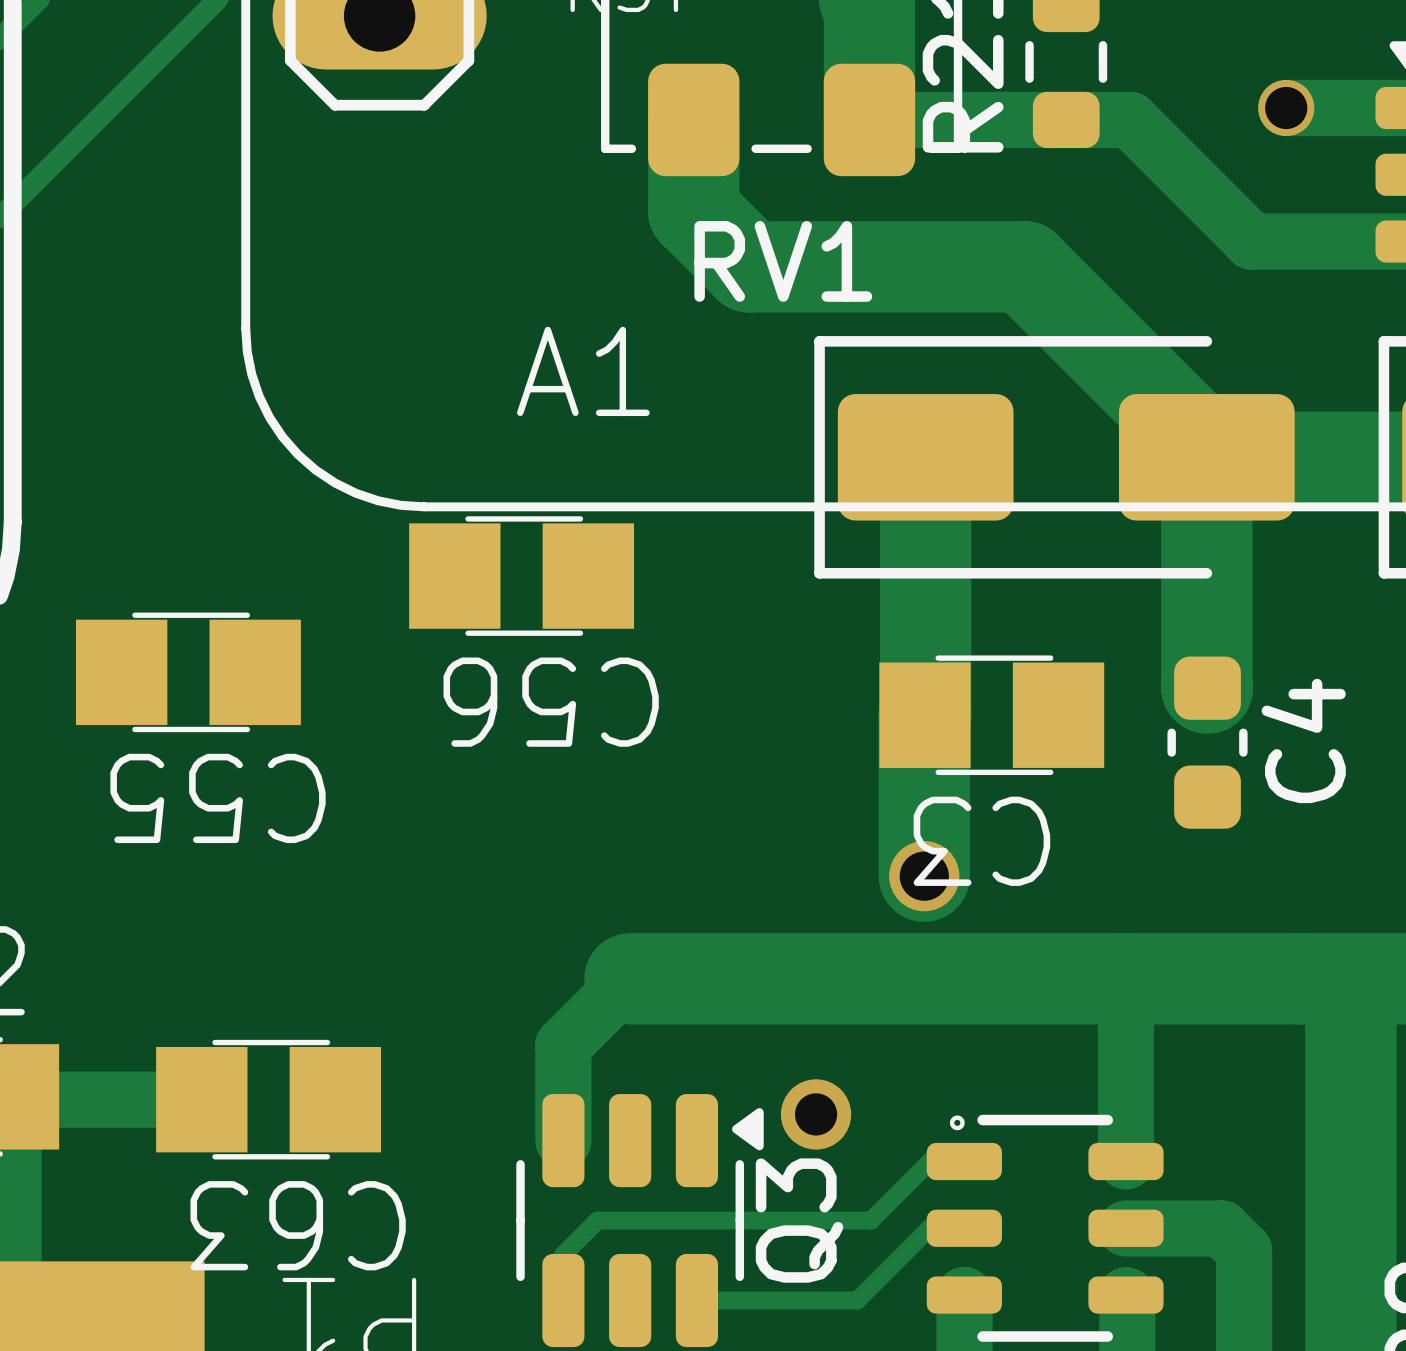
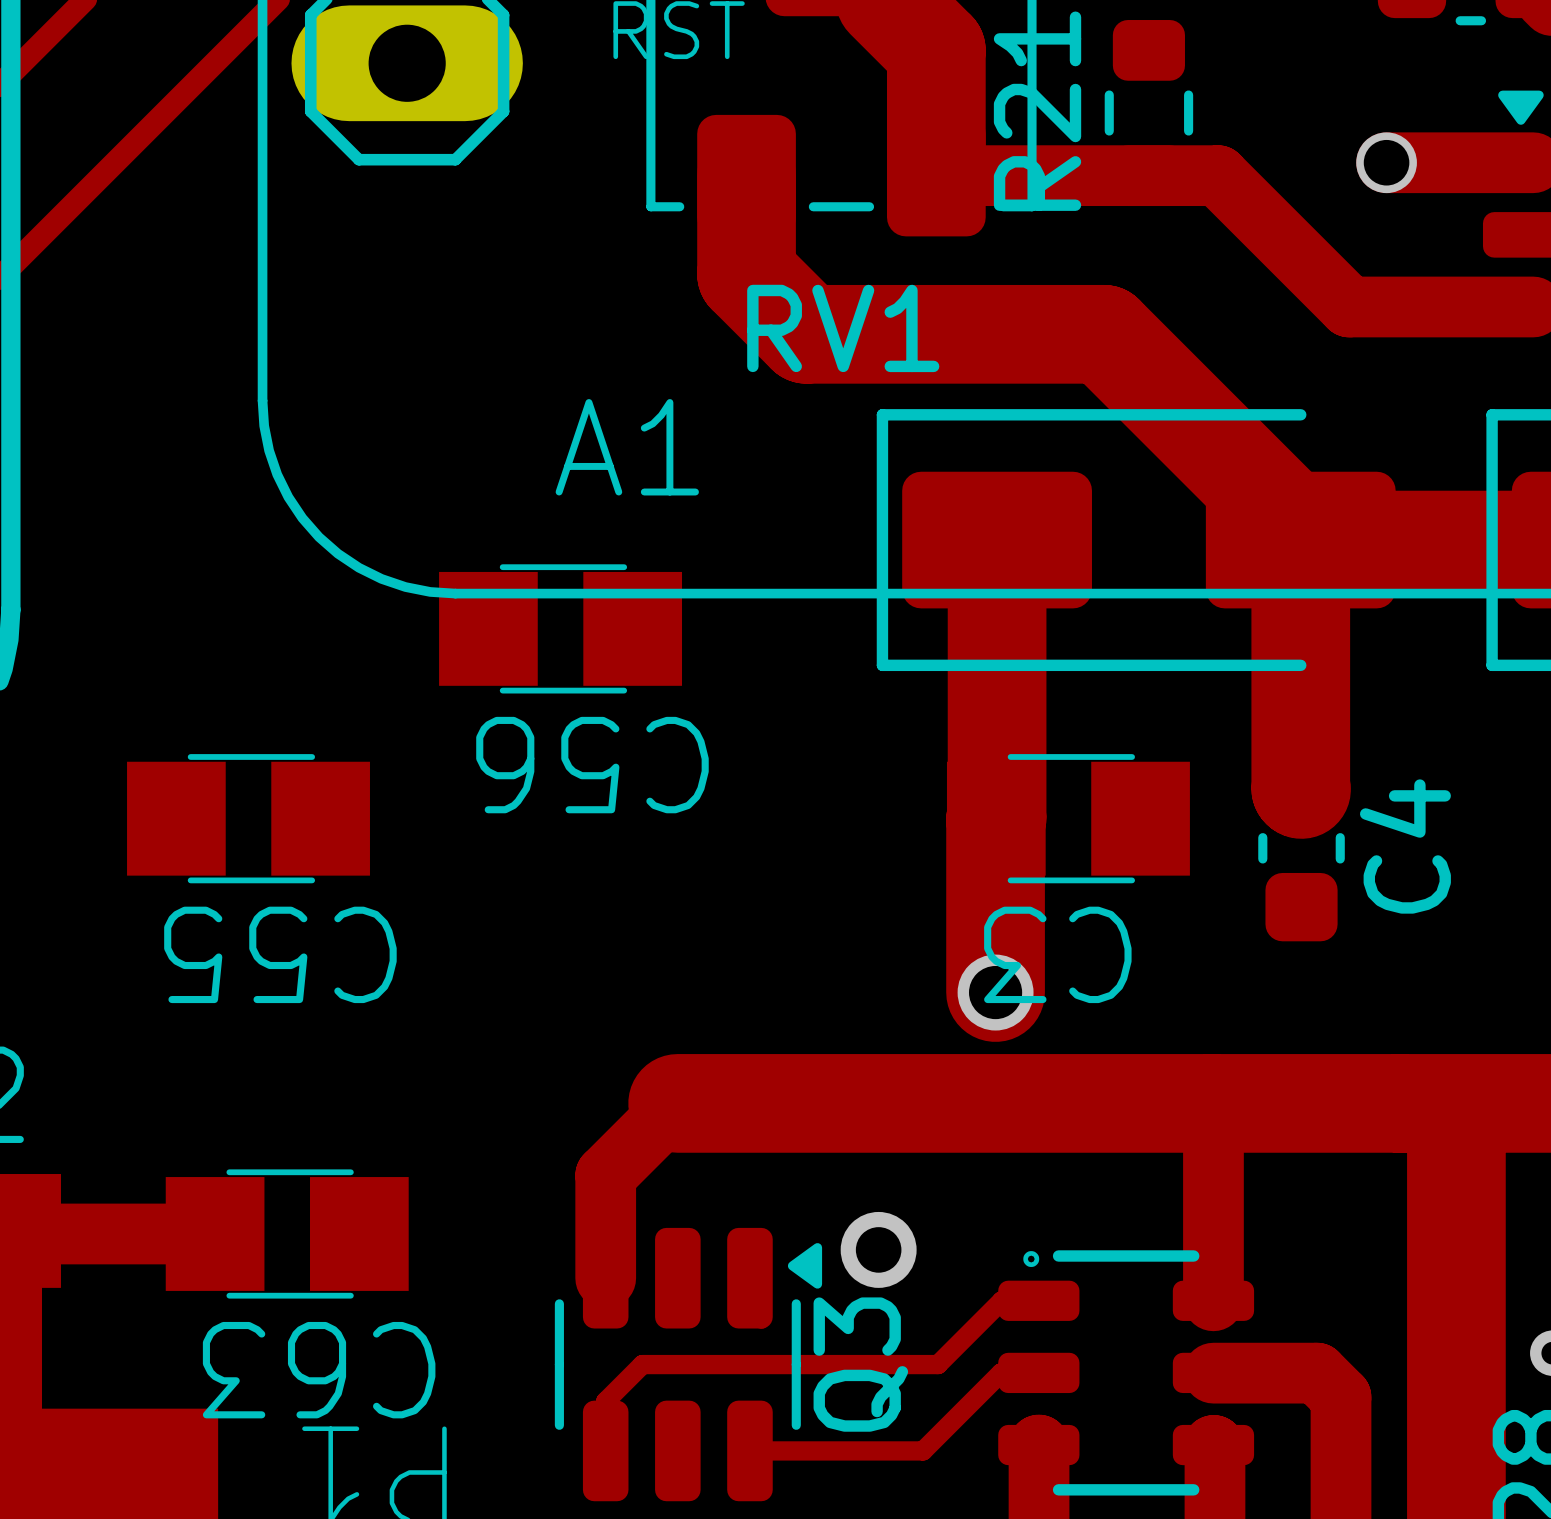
C56 position: (521, 576) -> (560, 628)
C55 position: (188, 672) -> (248, 818)

